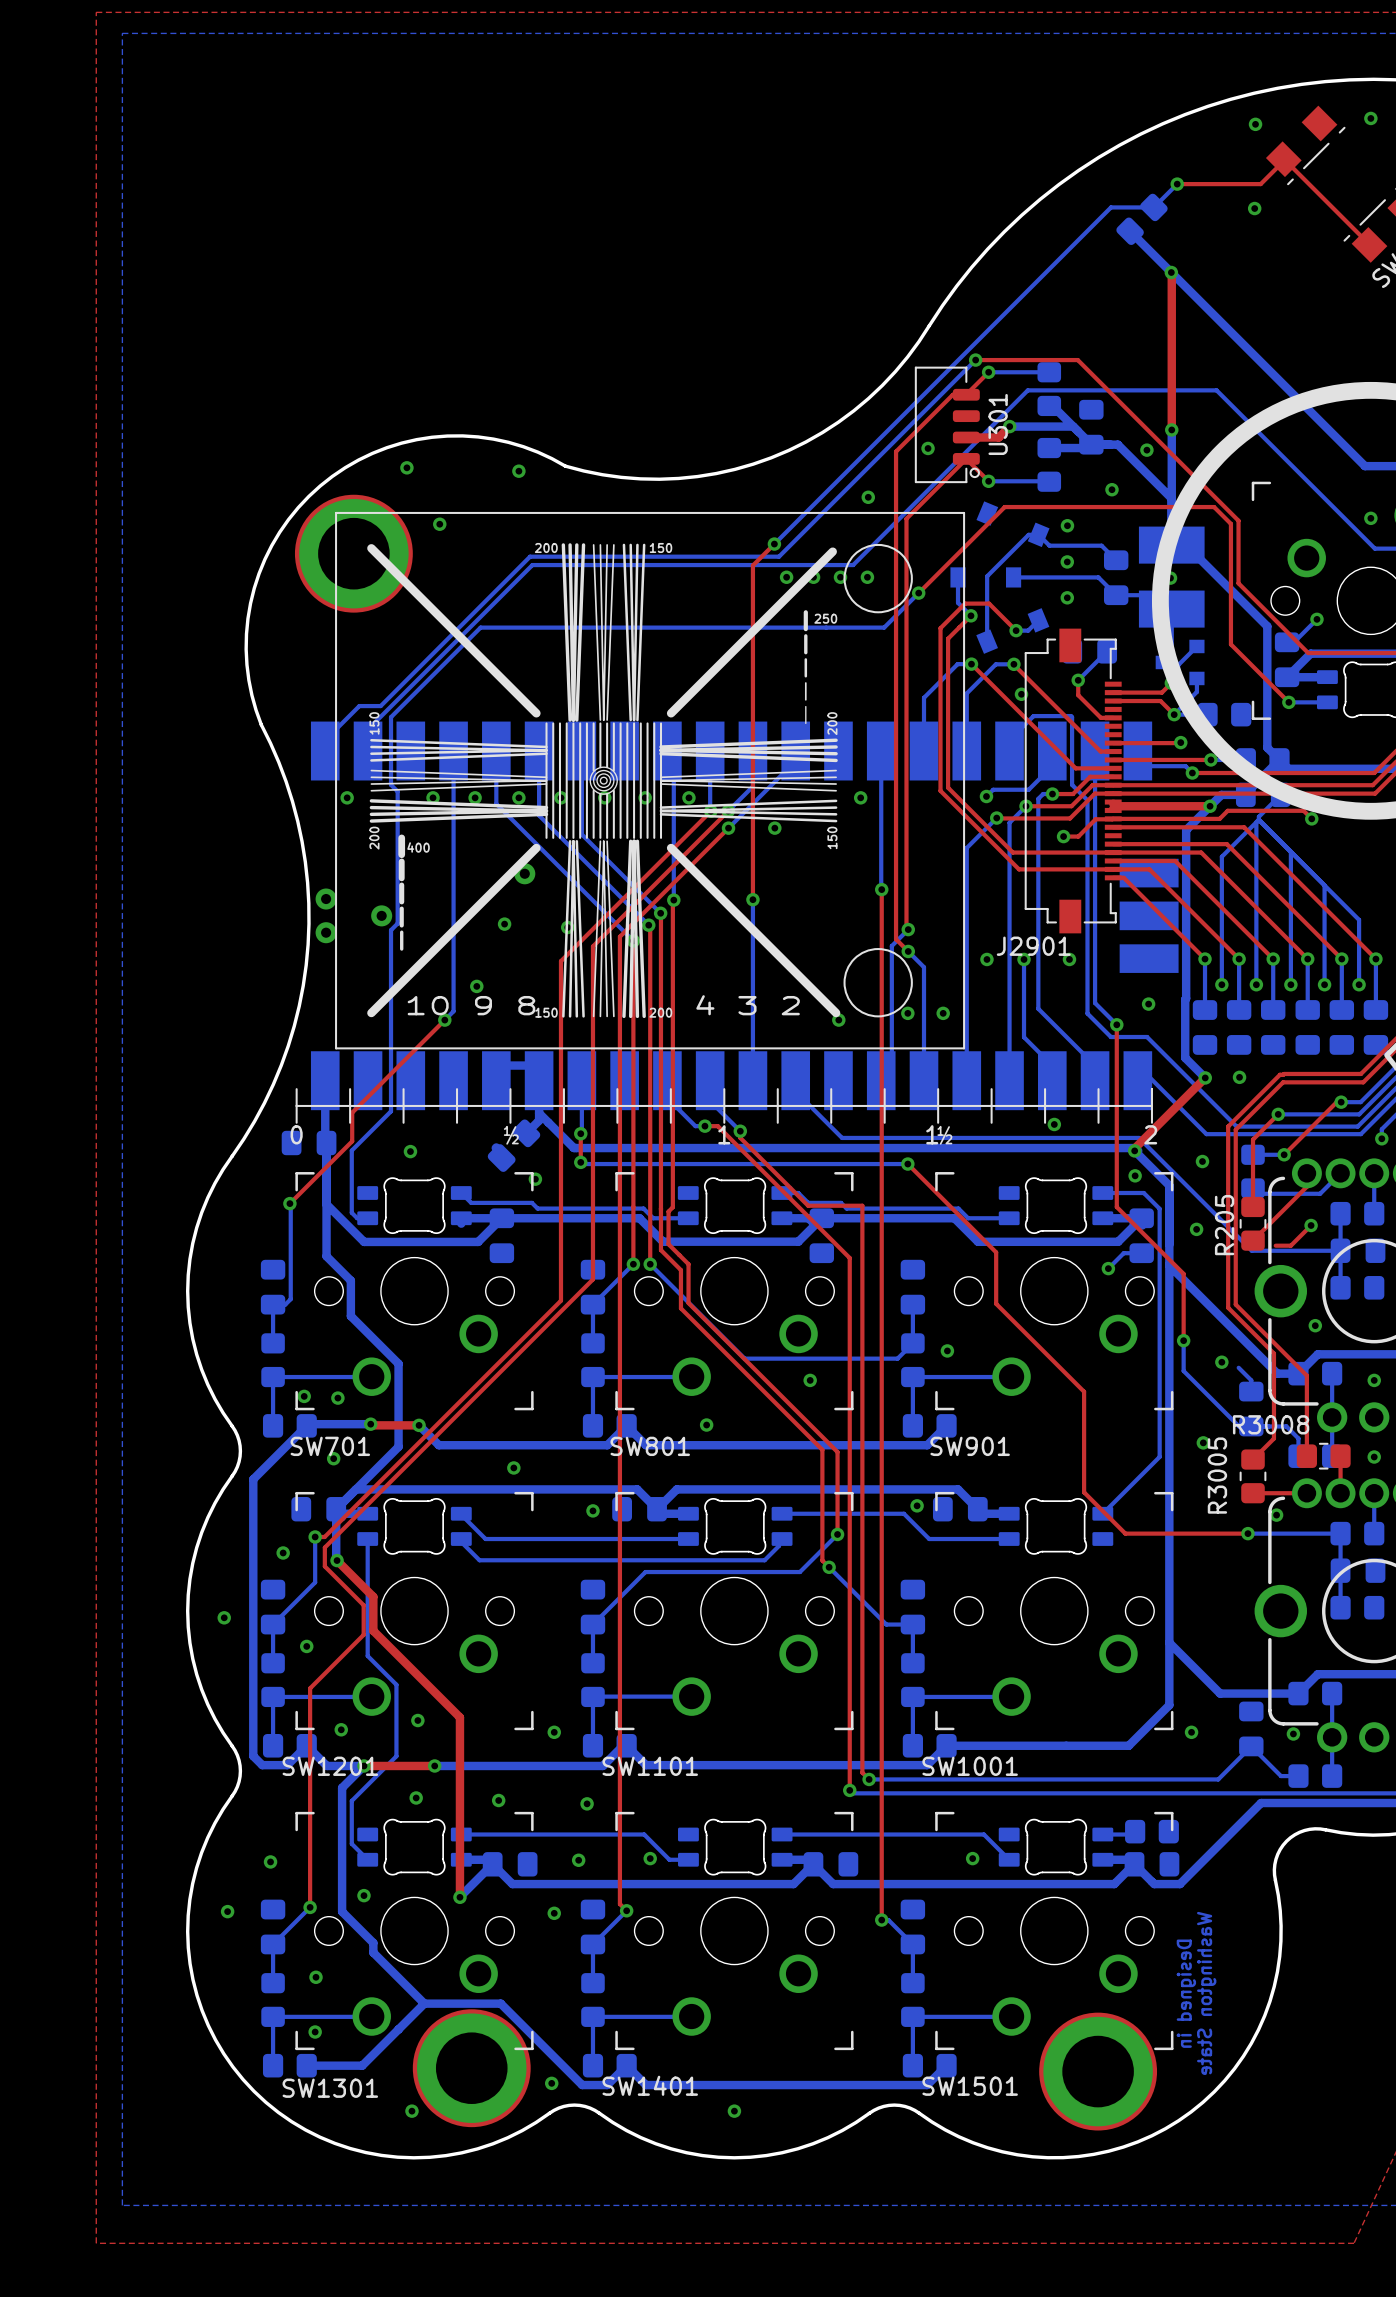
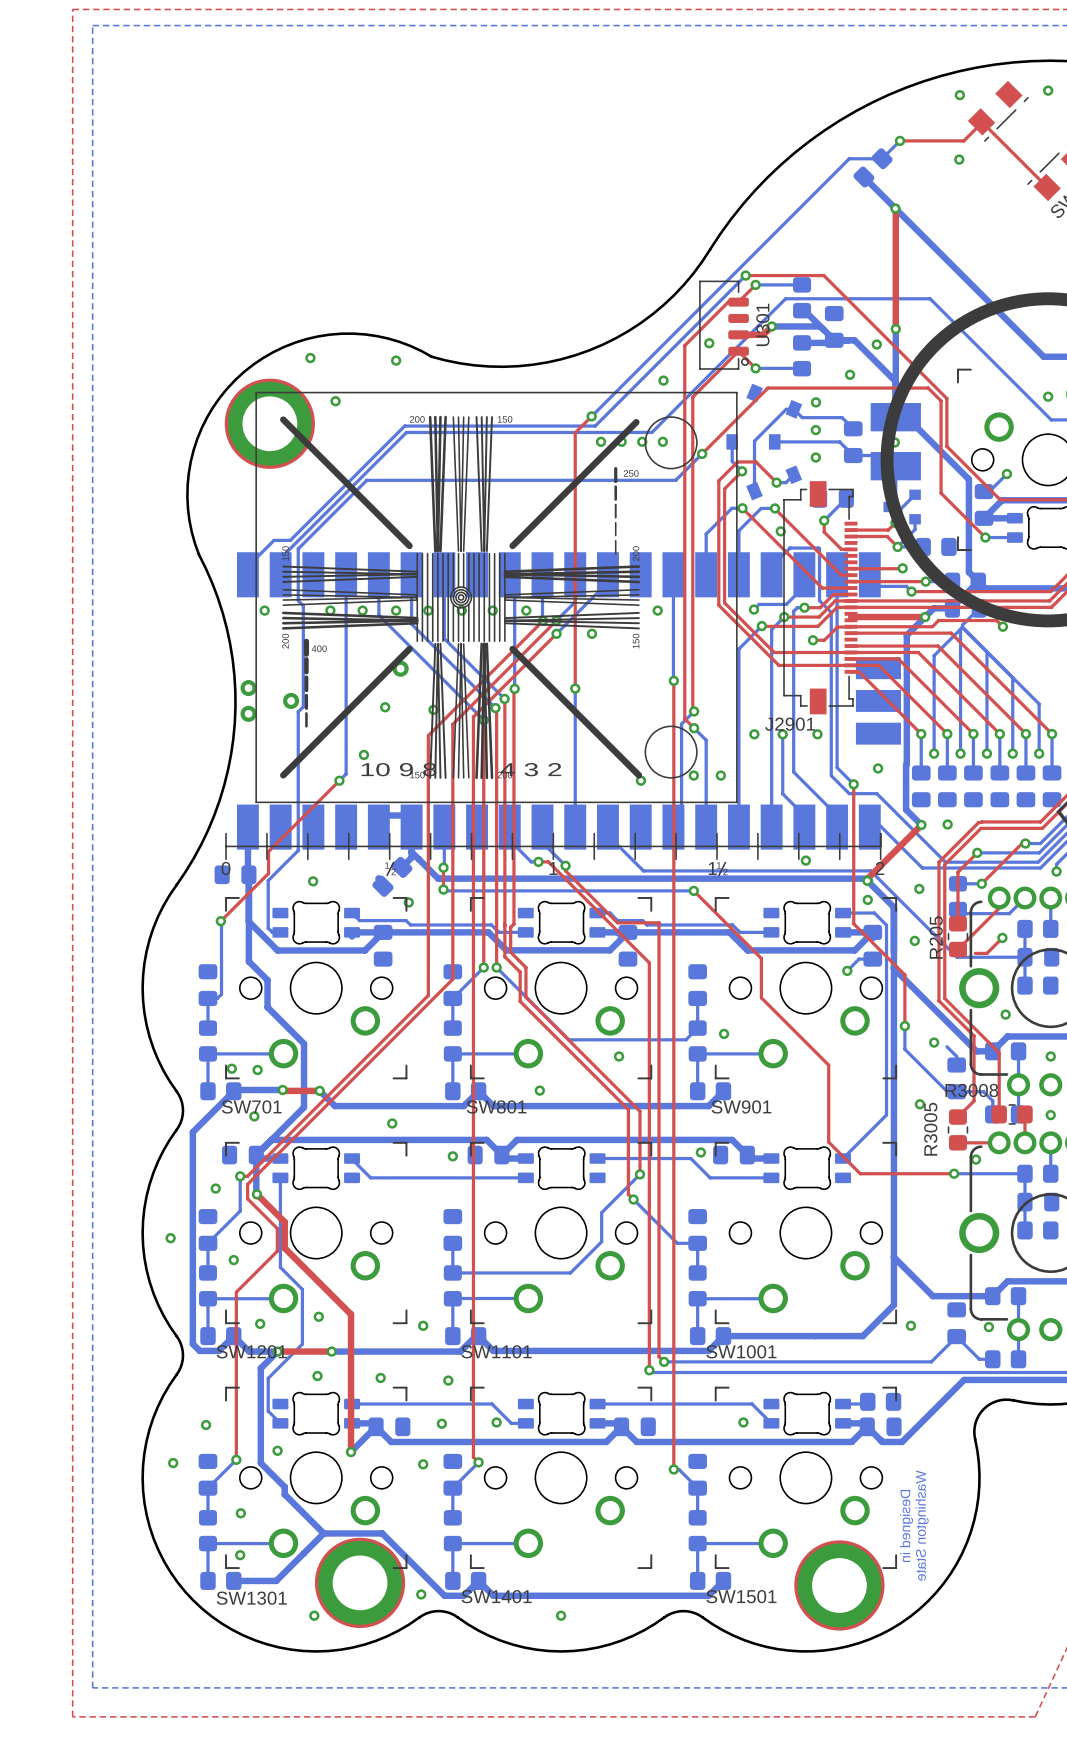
bottom track: (458, 1539) (479, 1560) (764, 1560) (779, 1545) (779, 1539) -> none
bottom track: (799, 1572) (645, 1572) (592, 1624) -> (611, 1203) (601, 1212) (601, 1241) (570, 1272) (452, 1272)

